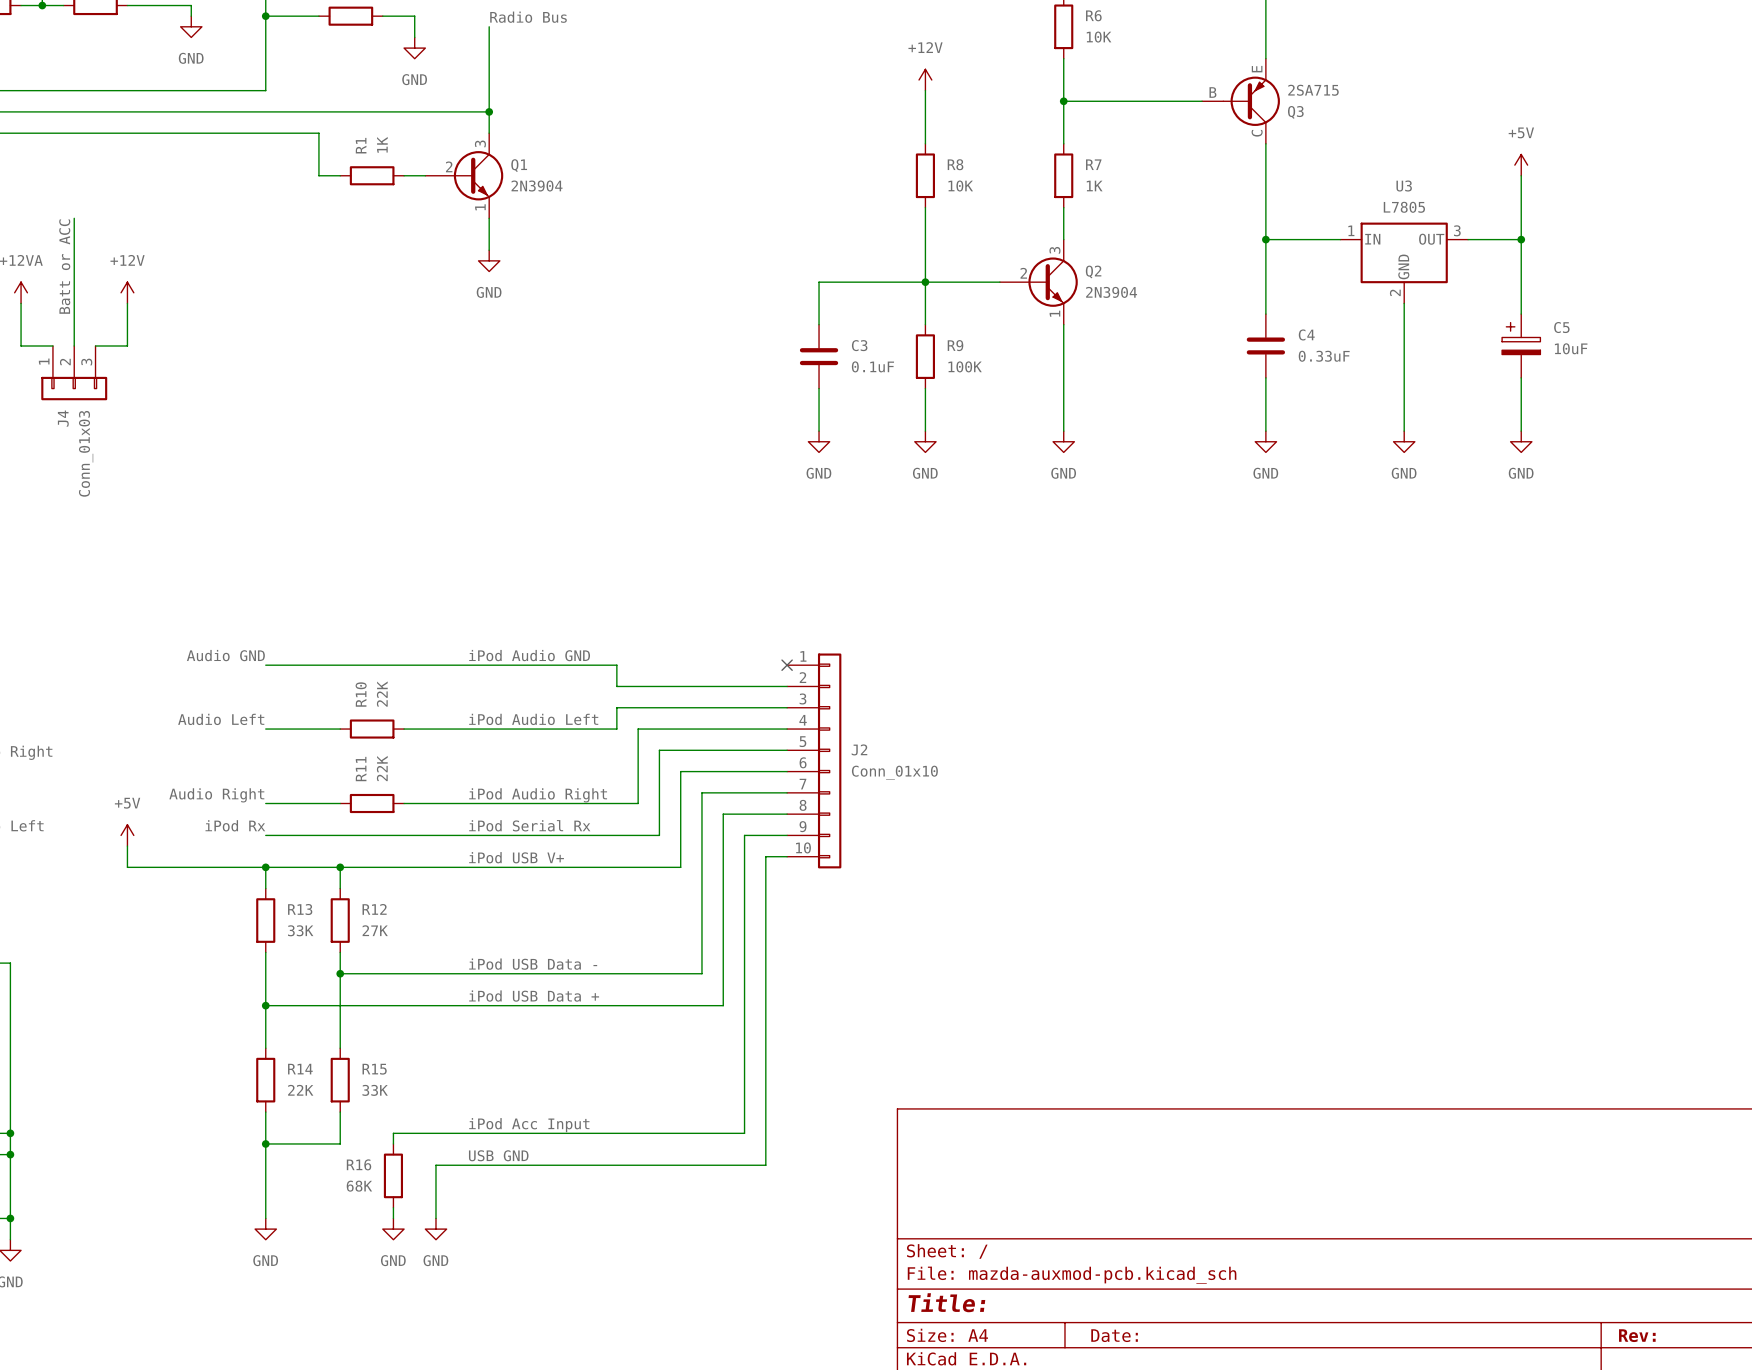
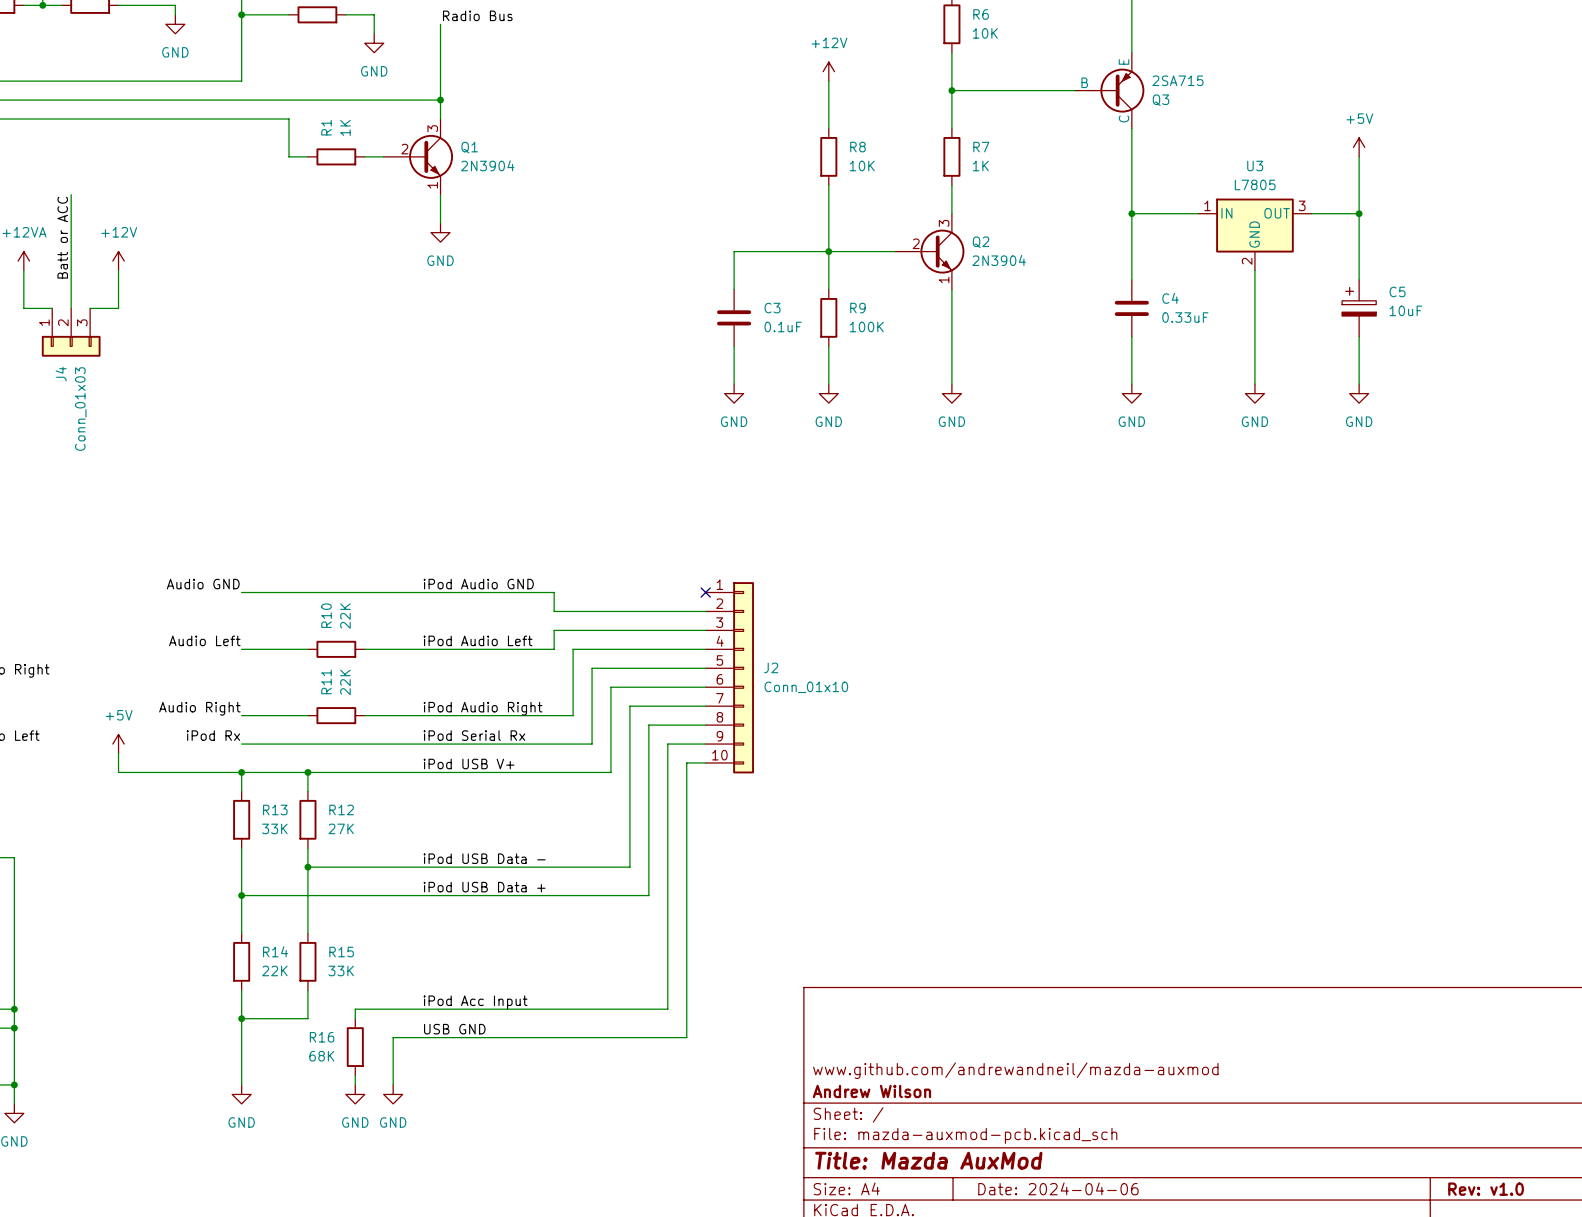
title block: none -> www.github.com/andrewandneil/mazda-auxmod (1015, 1070)
title block: none -> Andrew Wilson (871, 1091)
title block: Title: (946, 1302) -> Title: Mazda AuxMod (928, 1160)
title block: Date: (1114, 1335) -> Date: 2024-04-06 (1058, 1188)
title block: Rev: (1637, 1335) -> Rev: v1.0 (1486, 1189)

